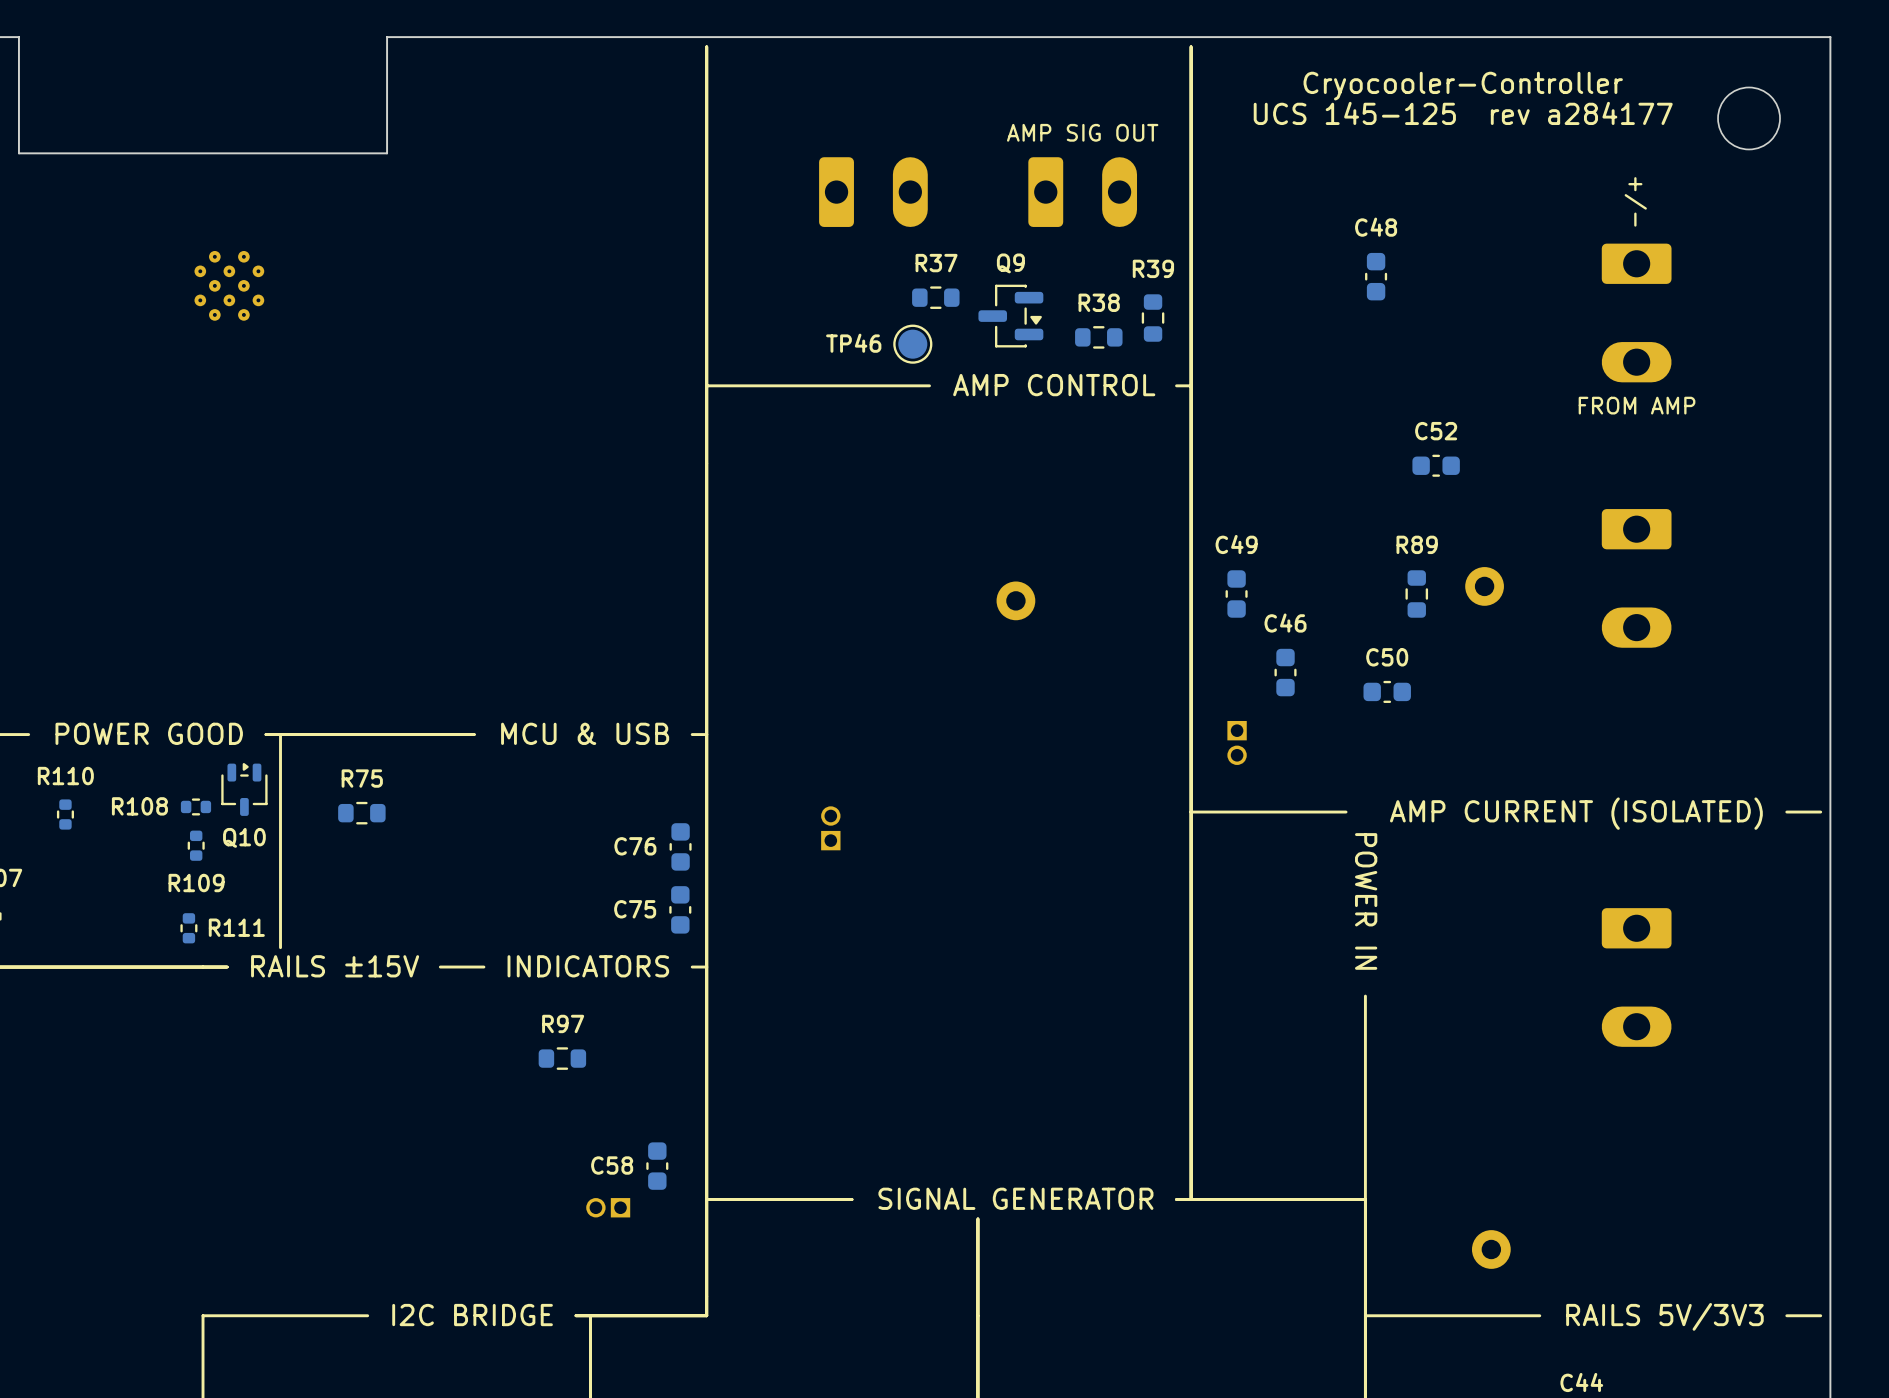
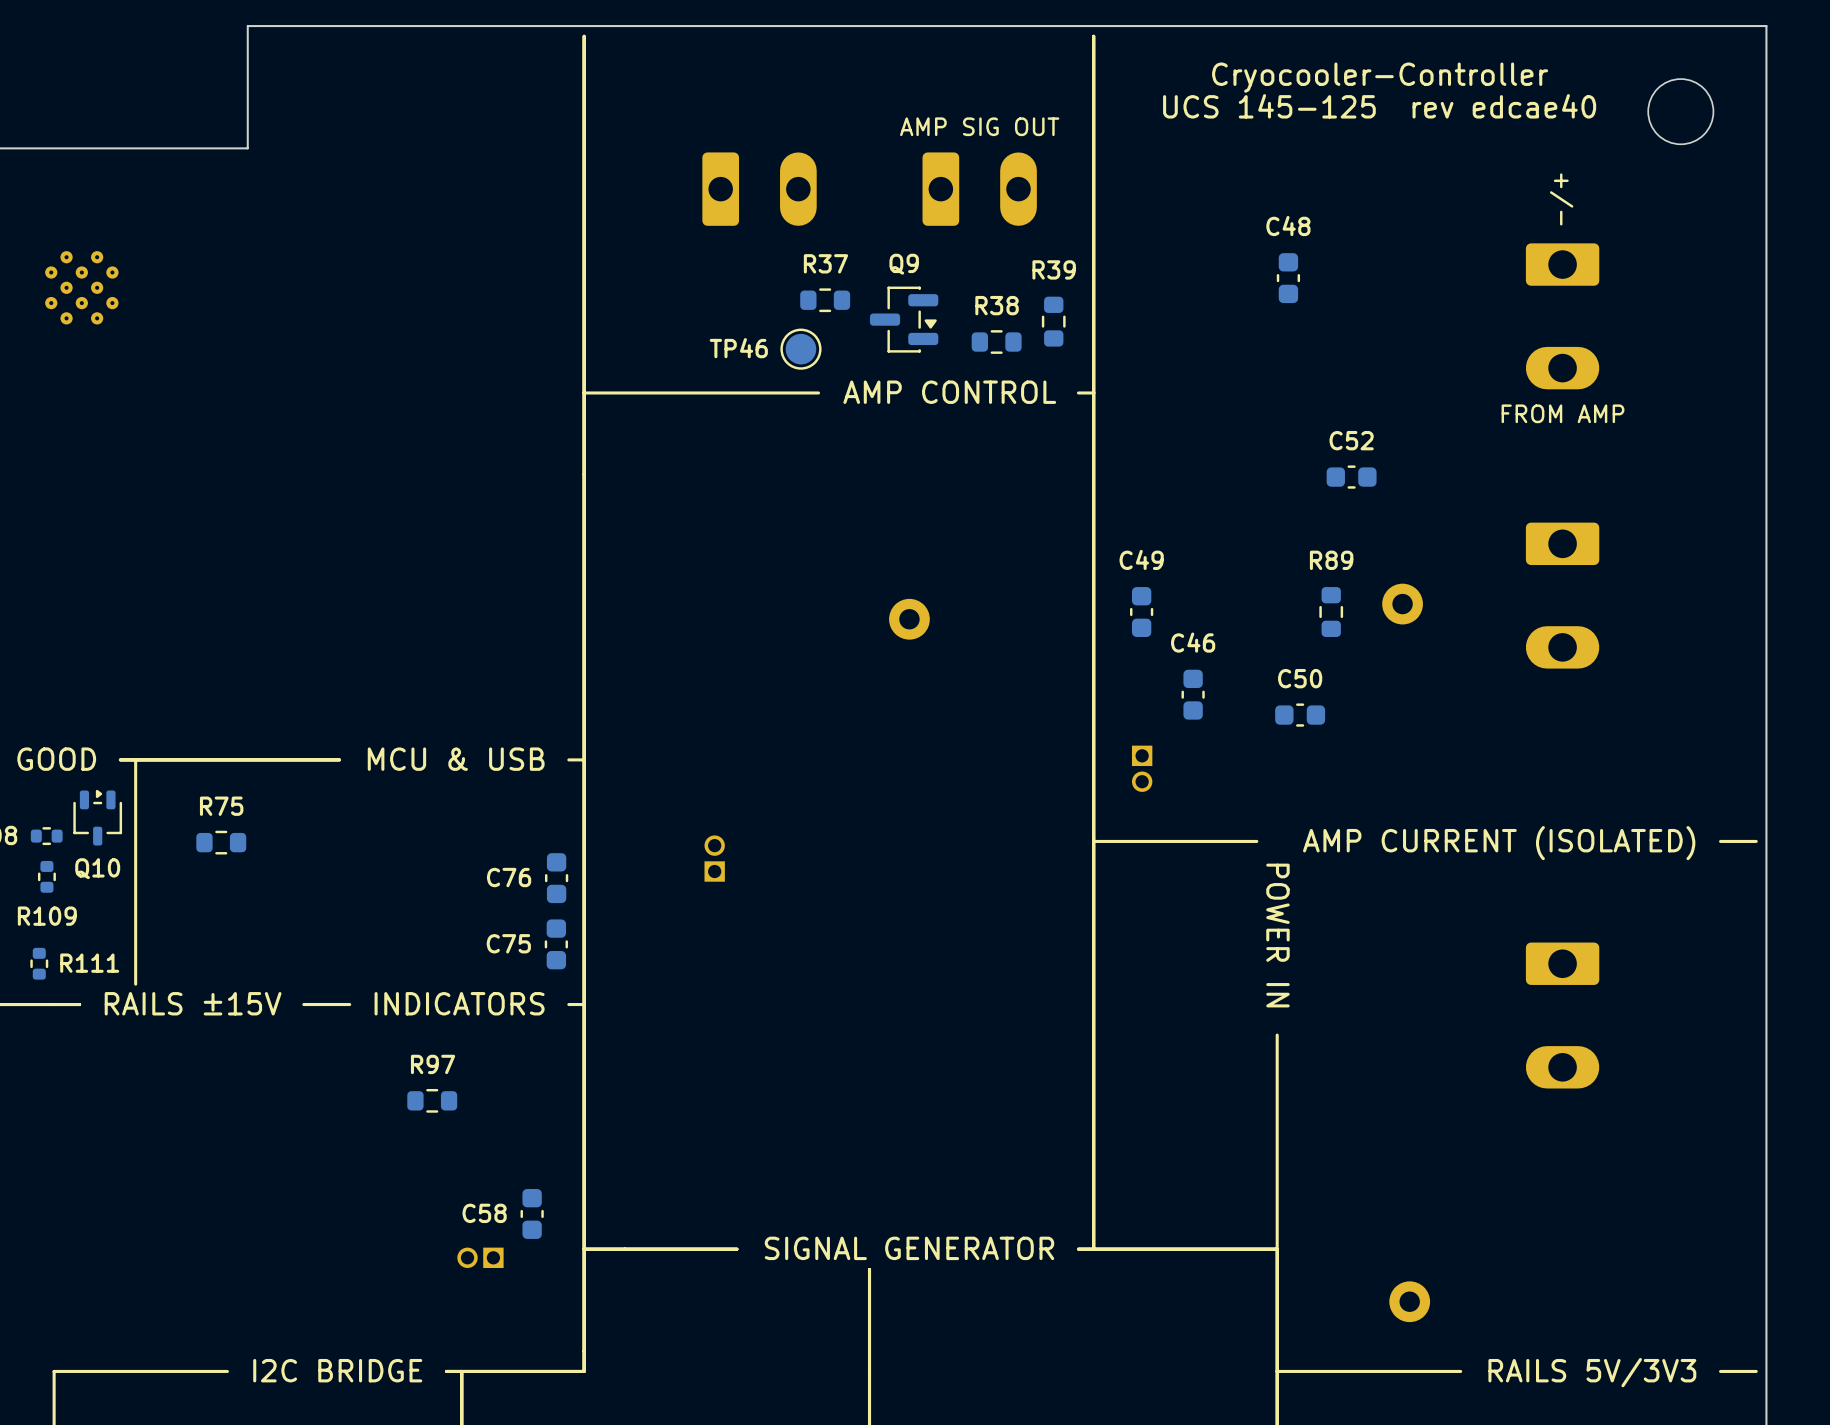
text: UCS 145-125 rev a284177 (1463, 113) -> UCS 145-125 rev edcae40 (1379, 106)

